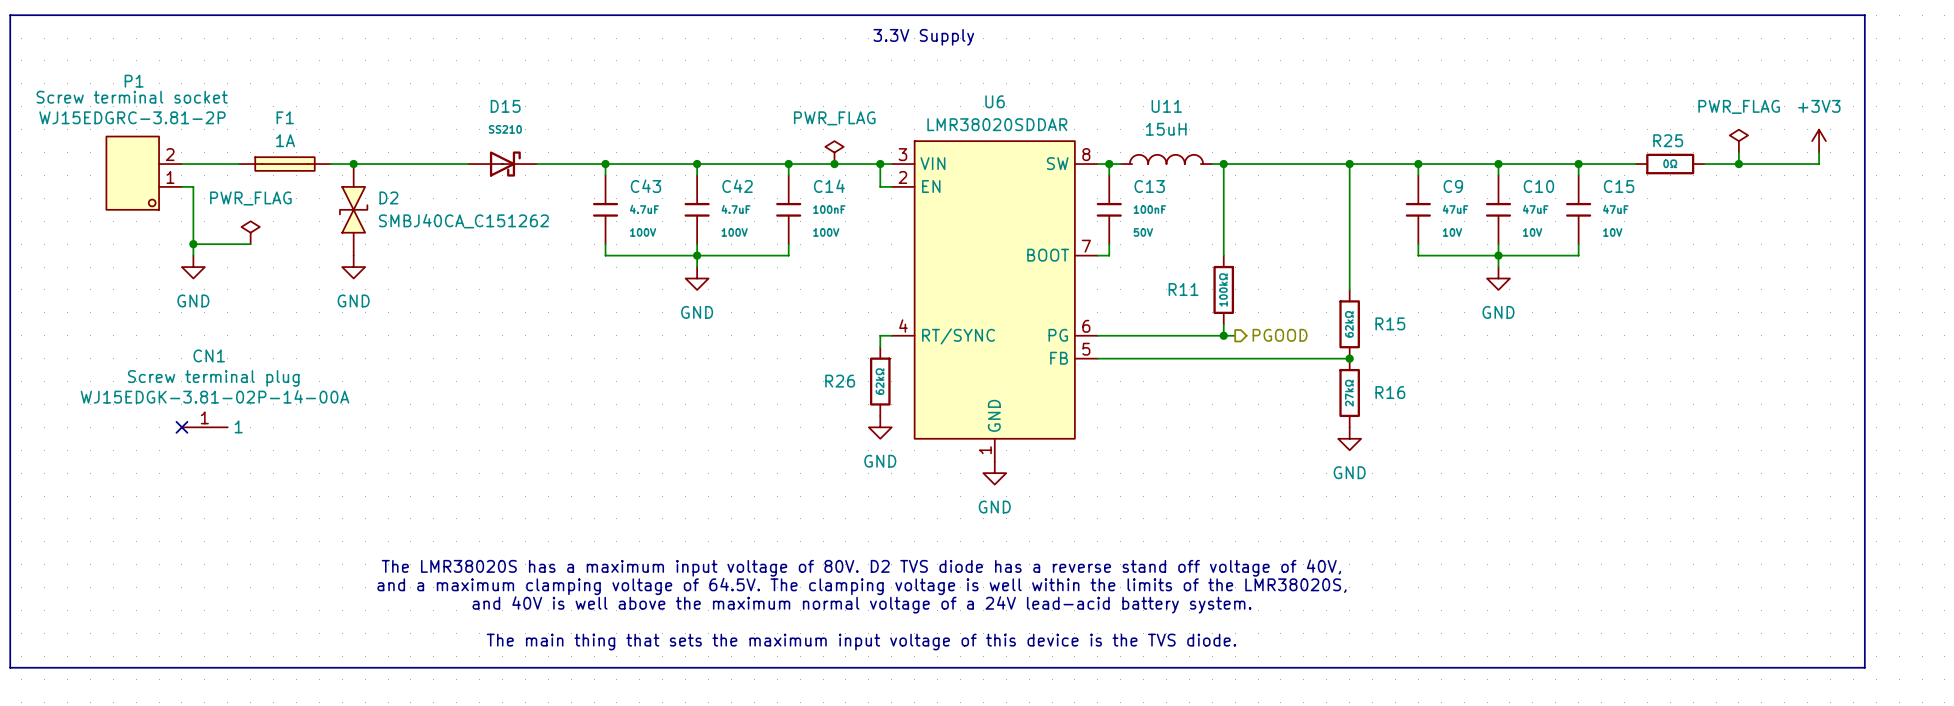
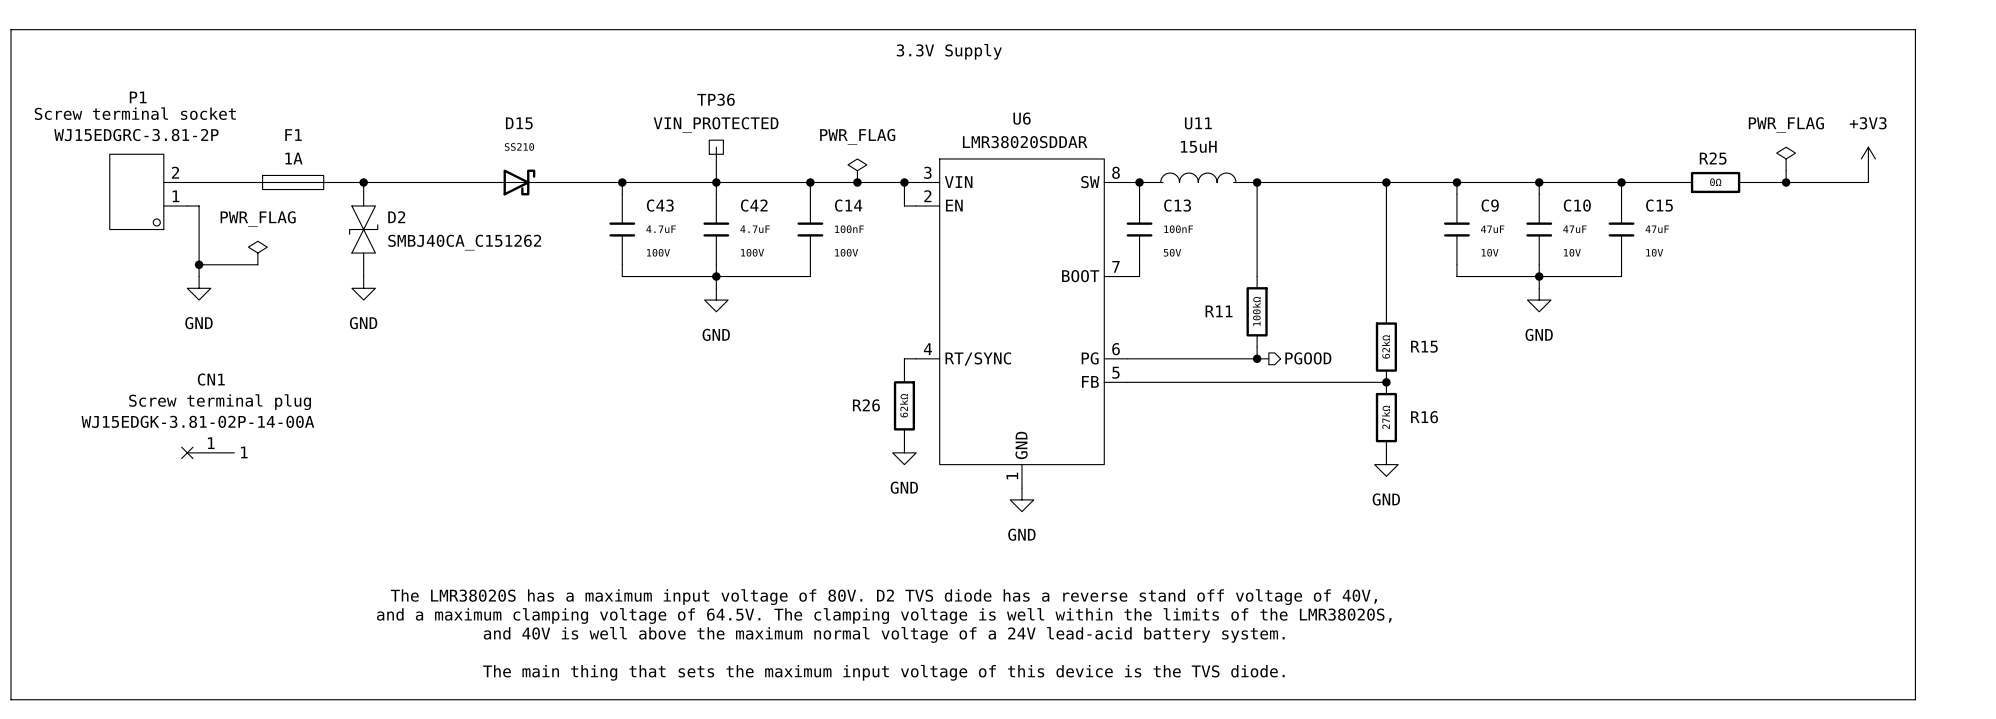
wire: none -> (716, 147) (716, 182)
TP36: none -> VIN_PROTECTED (716, 147)

